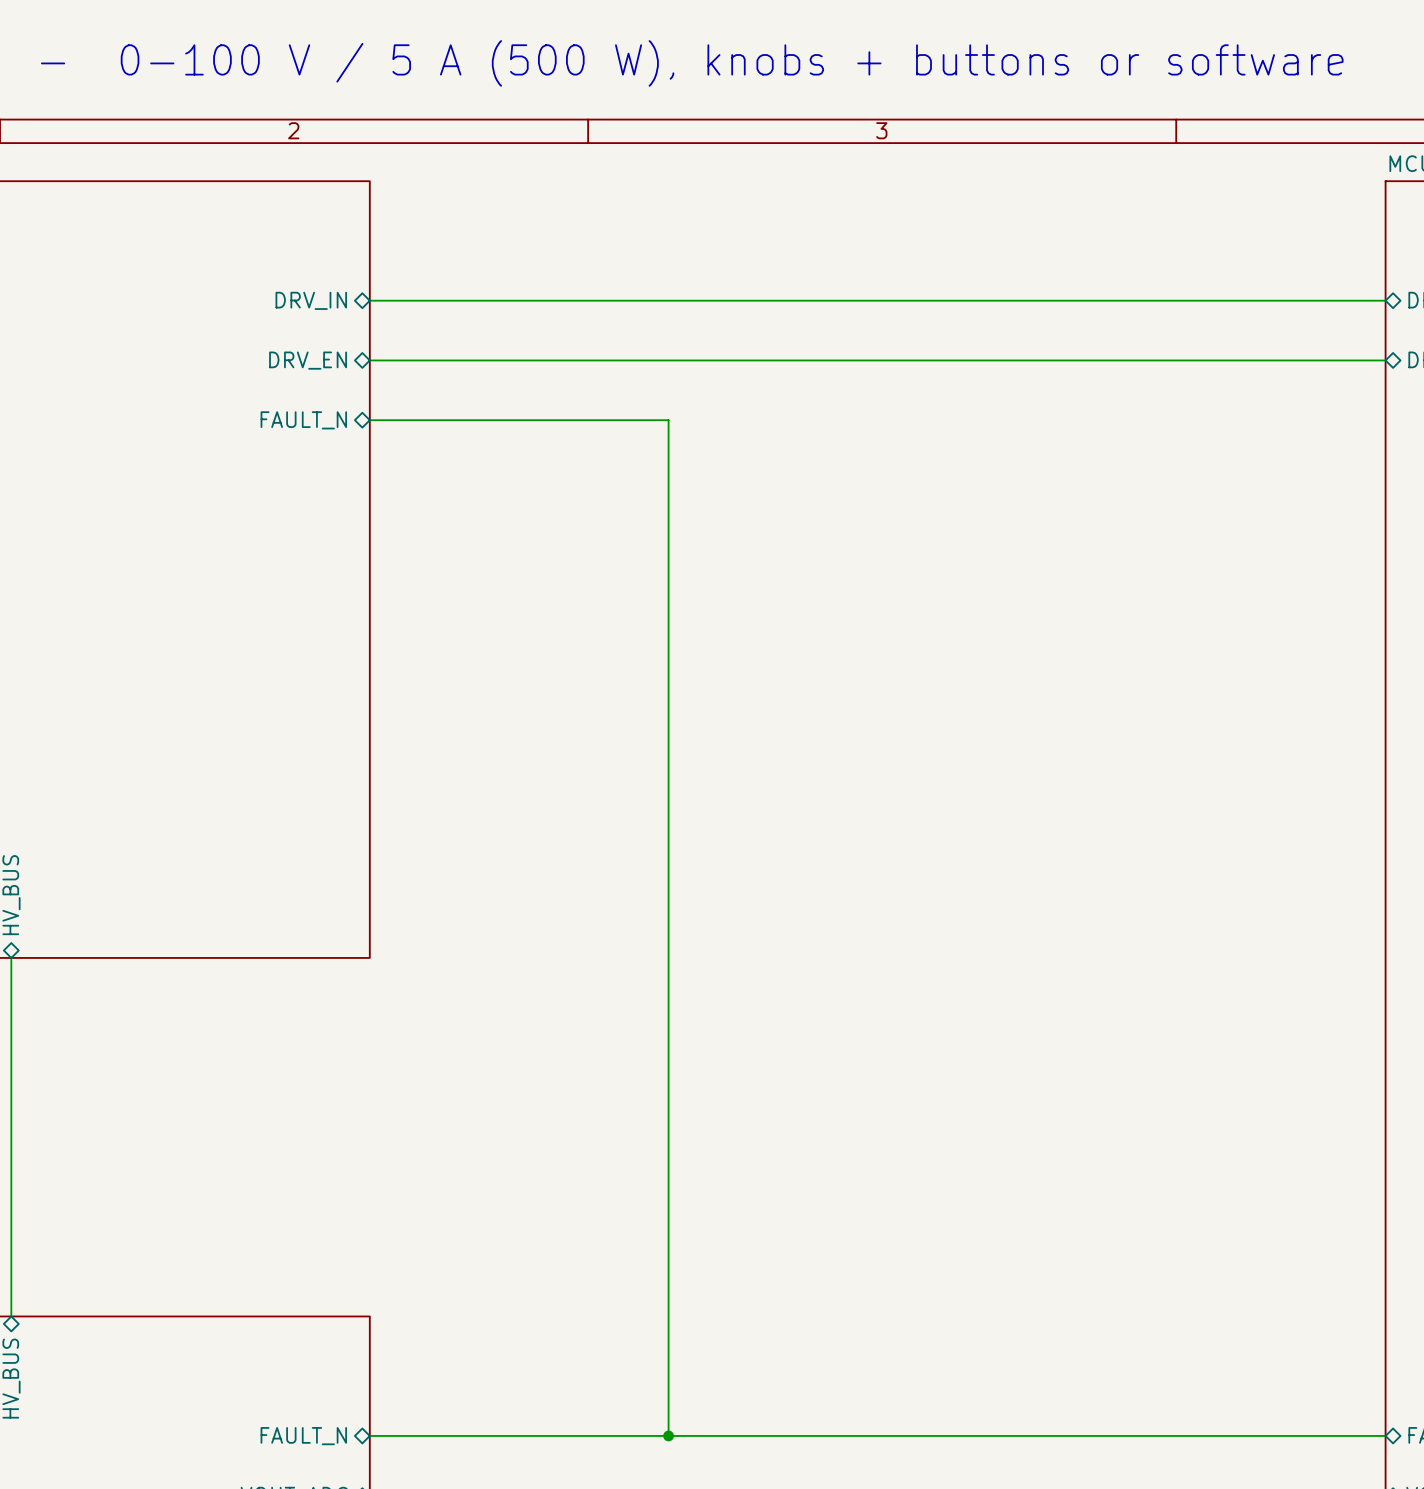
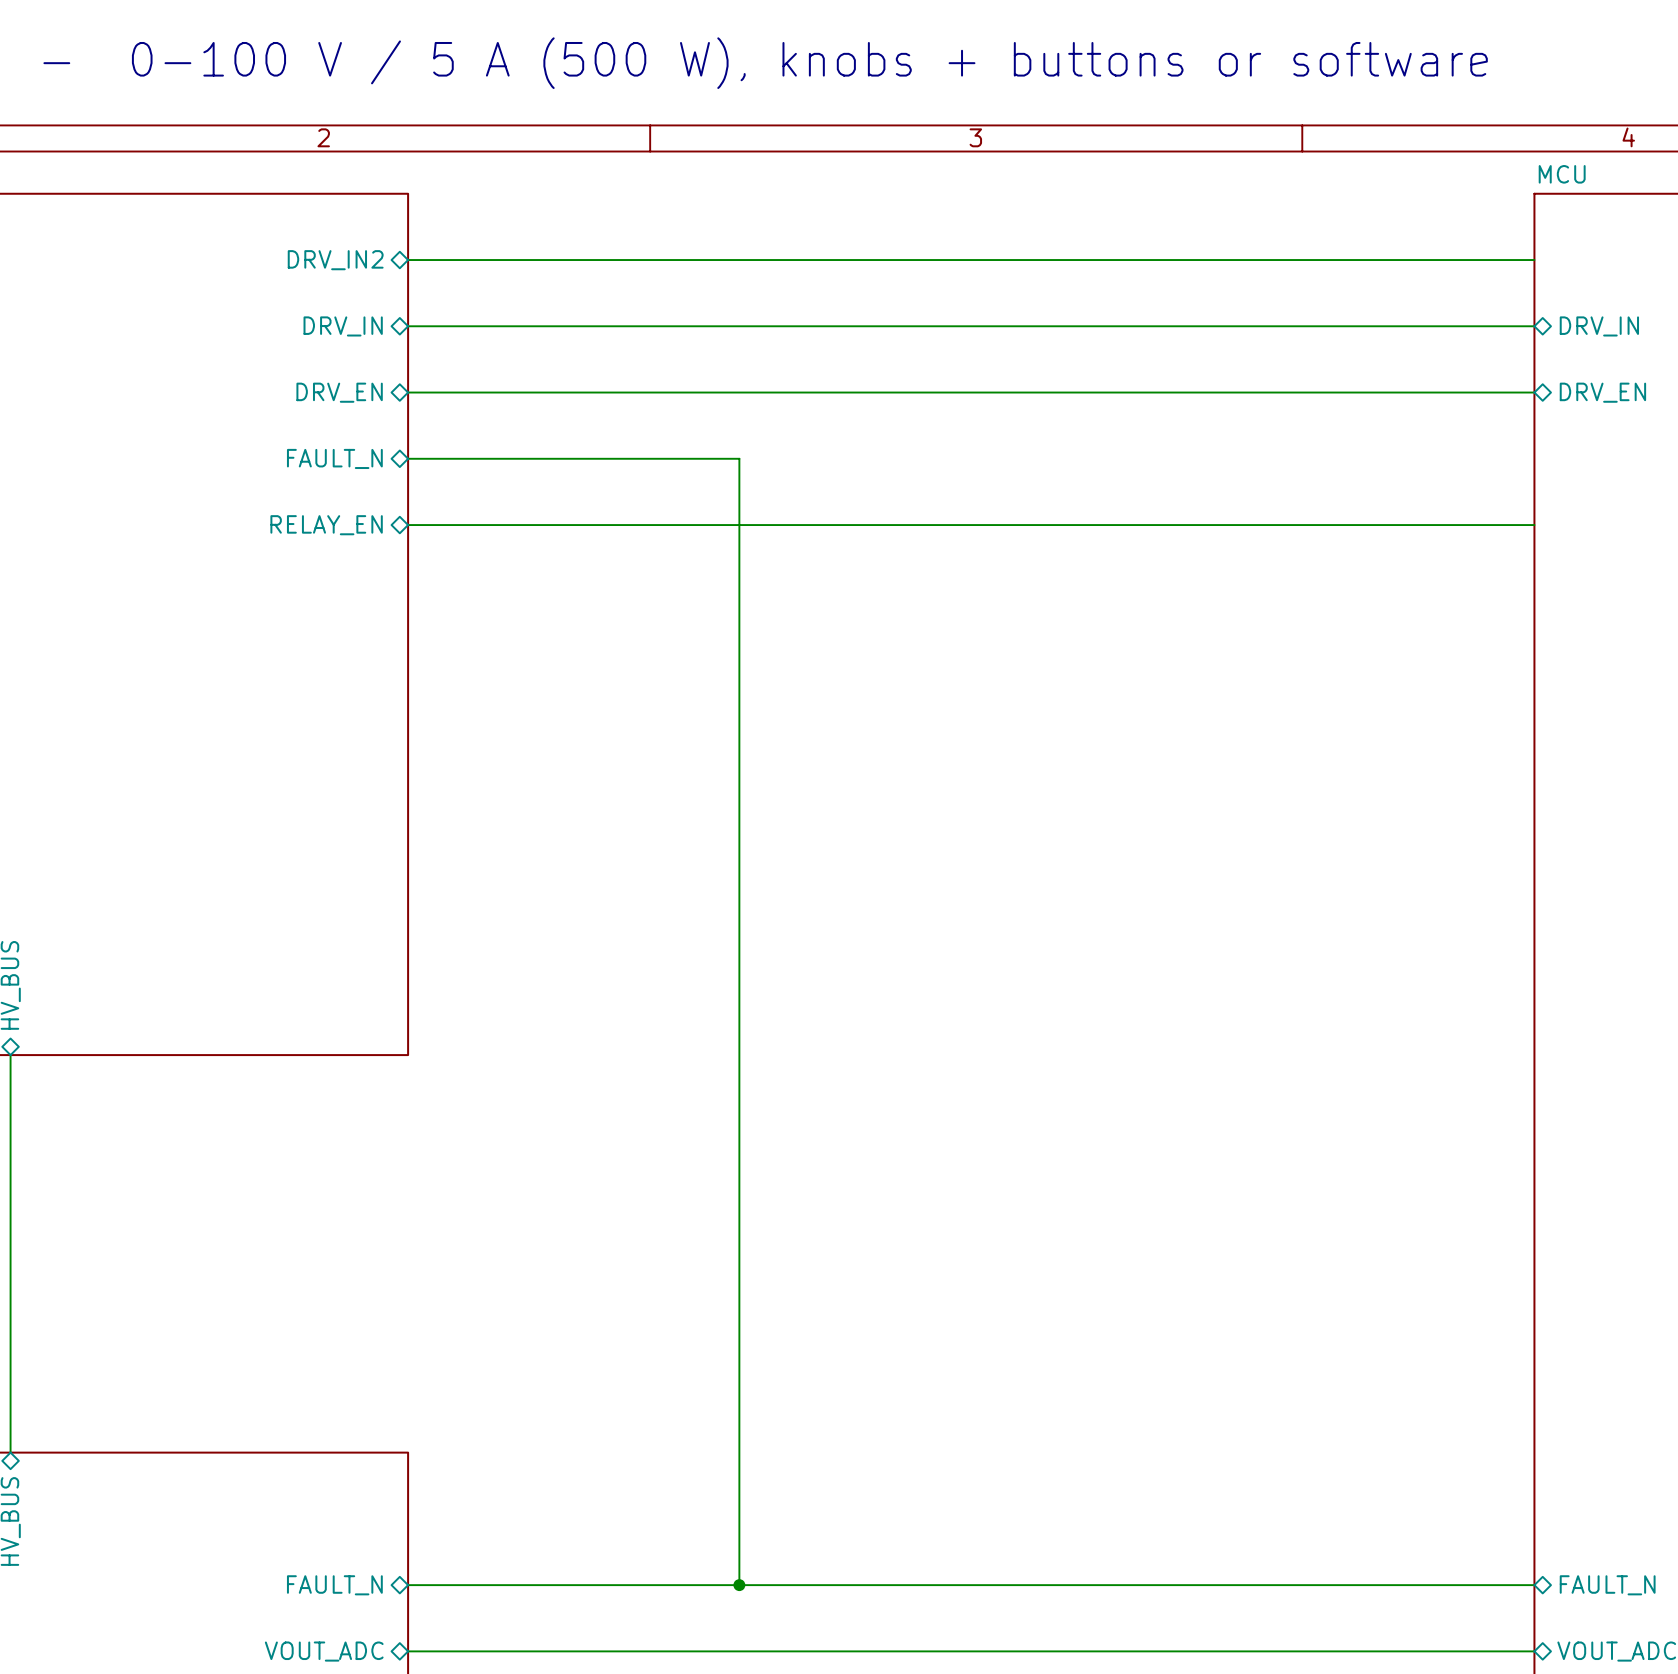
wire: none -> (408, 260) (1534, 260)
sheet pin: none -> DRV_IN2 (335, 260)
wire: none -> (408, 525) (1534, 525)
sheet pin: none -> RELAY_EN (326, 525)

